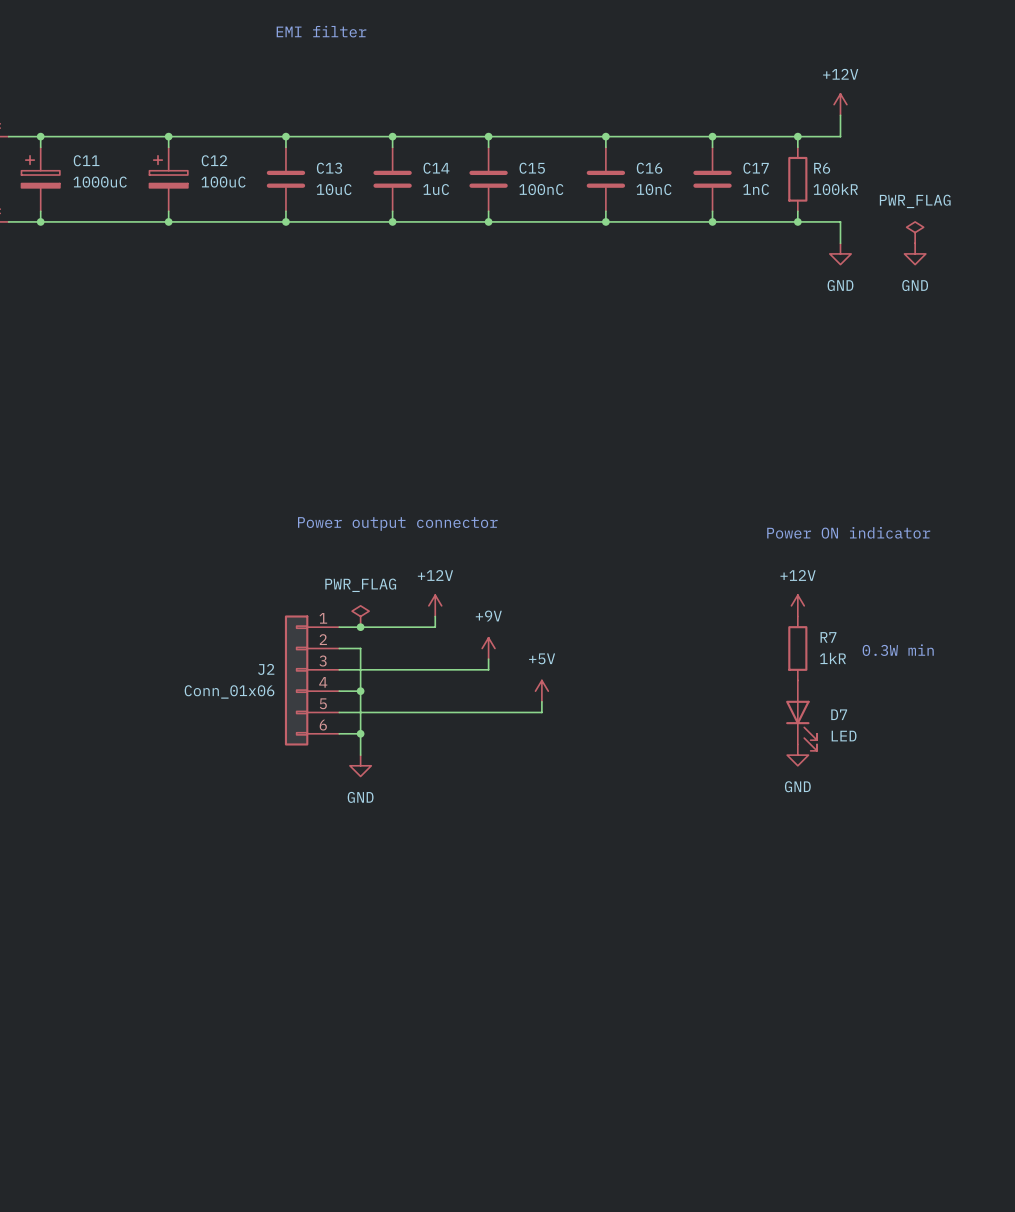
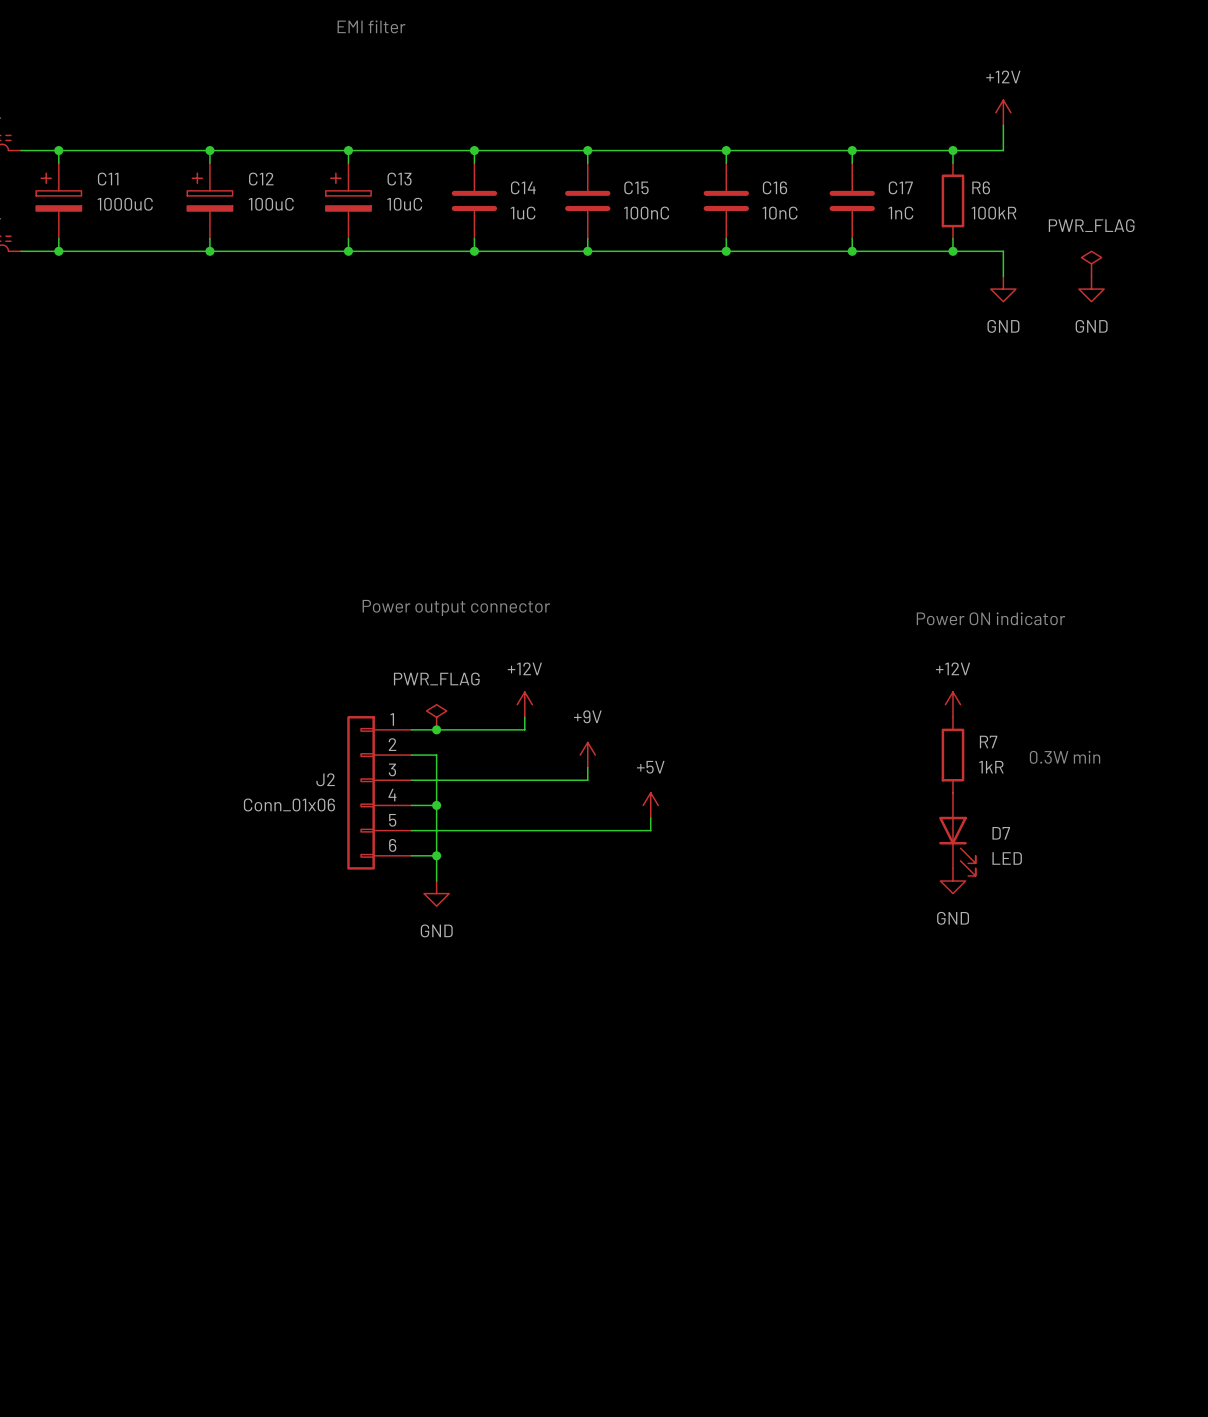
C13 symbol: [266, 147, 306, 212] -> [325, 163, 372, 239]

